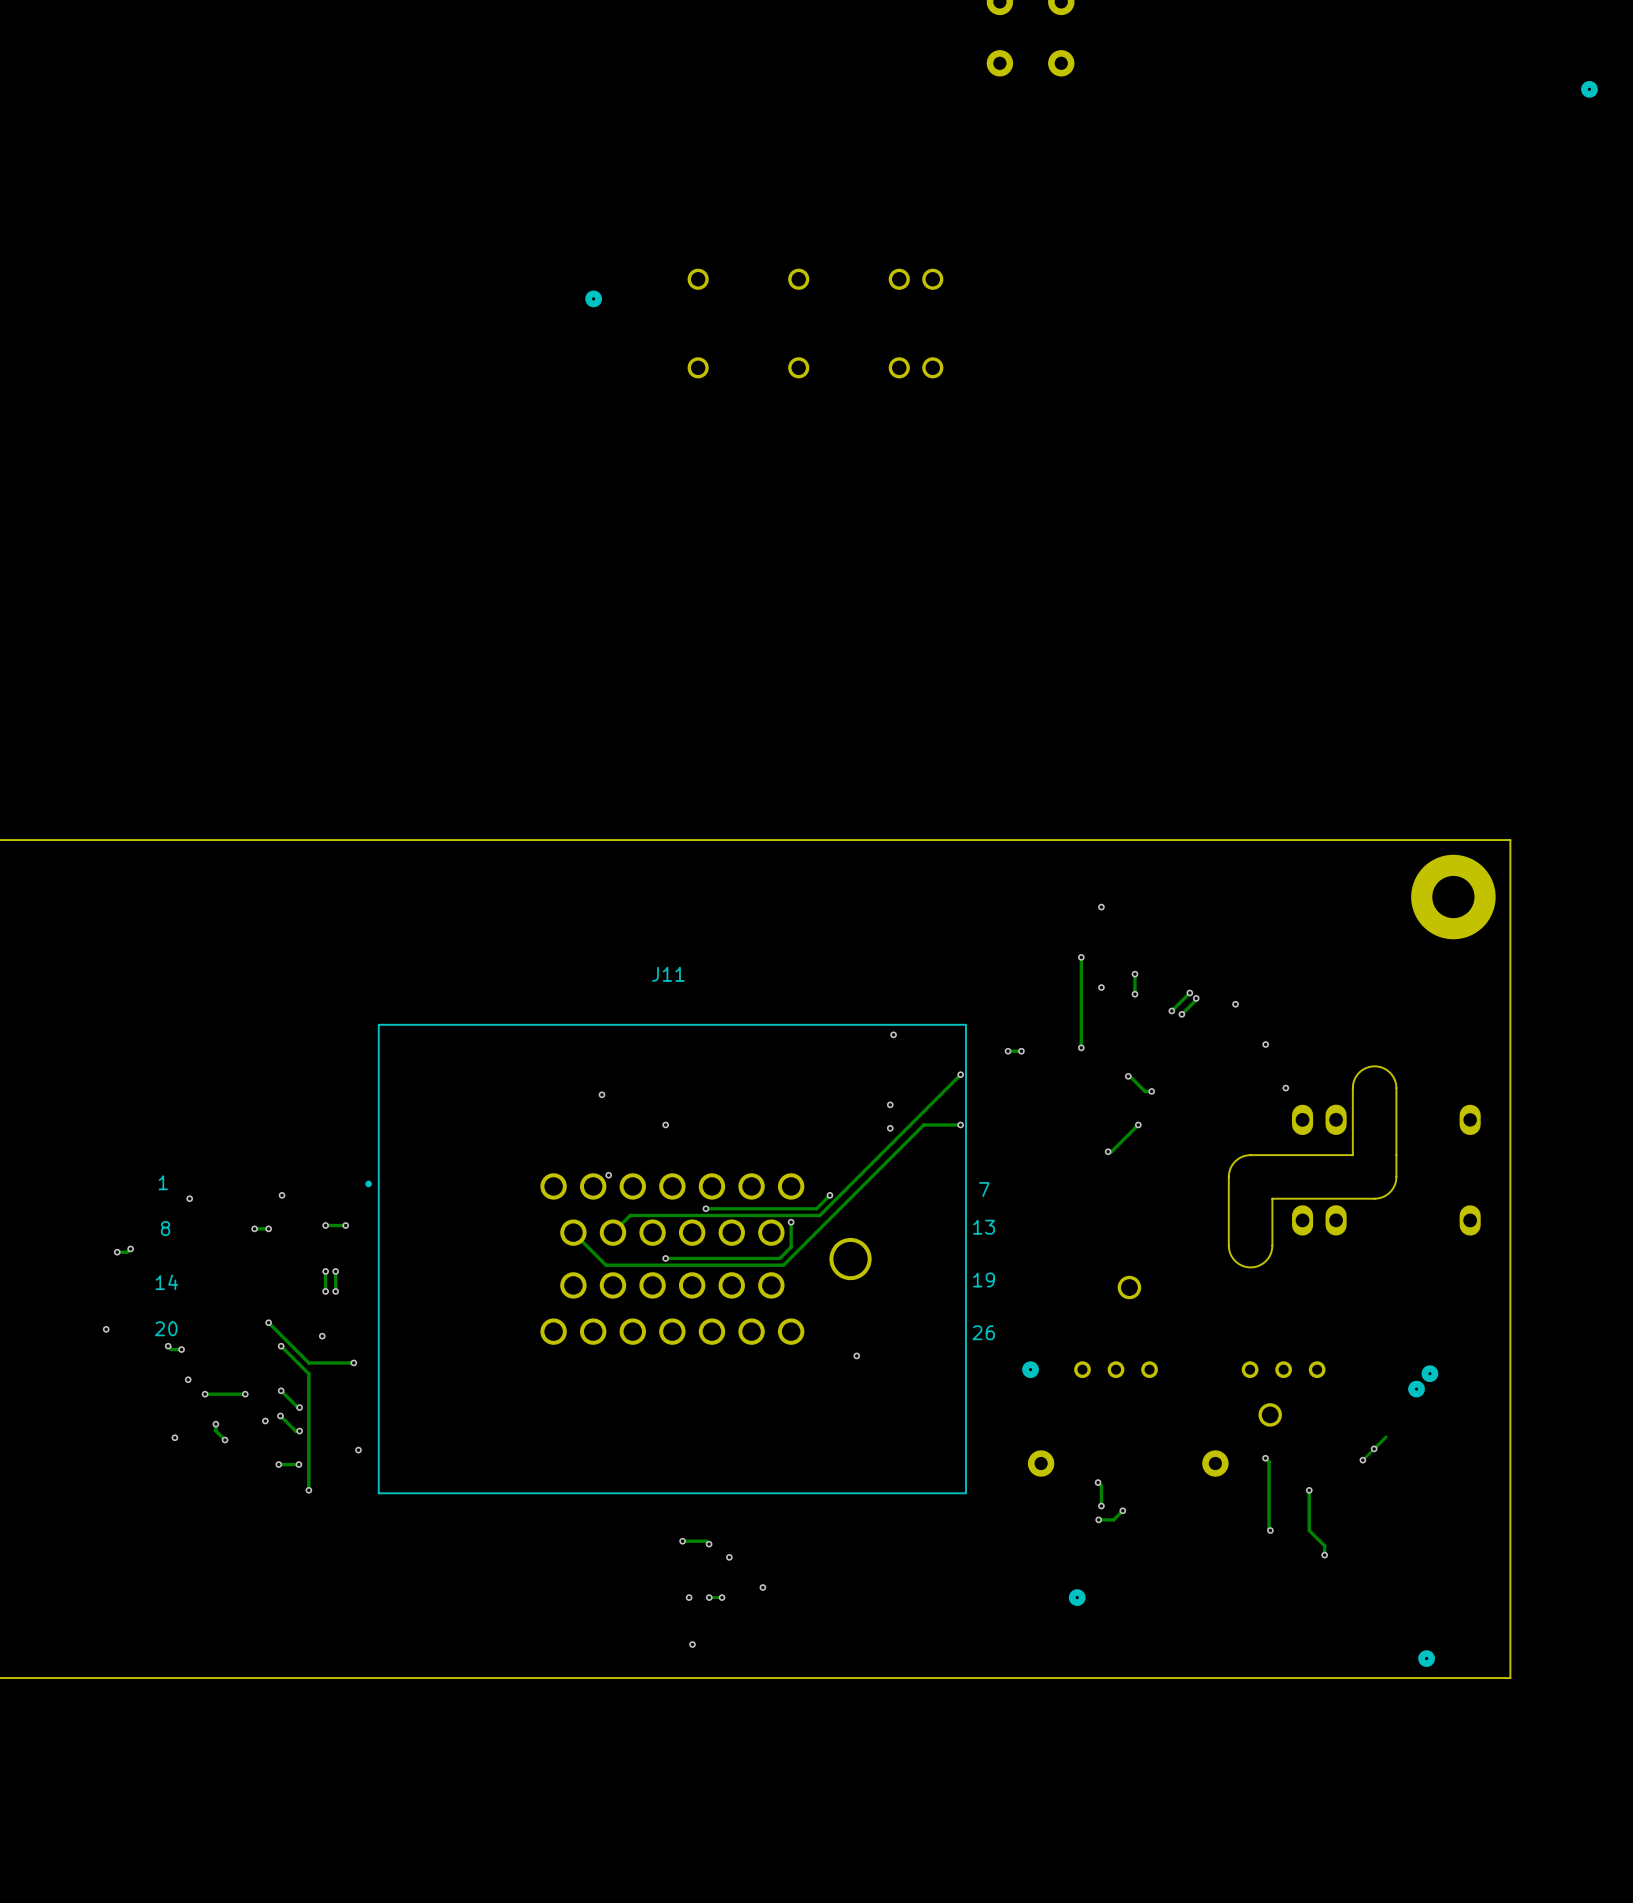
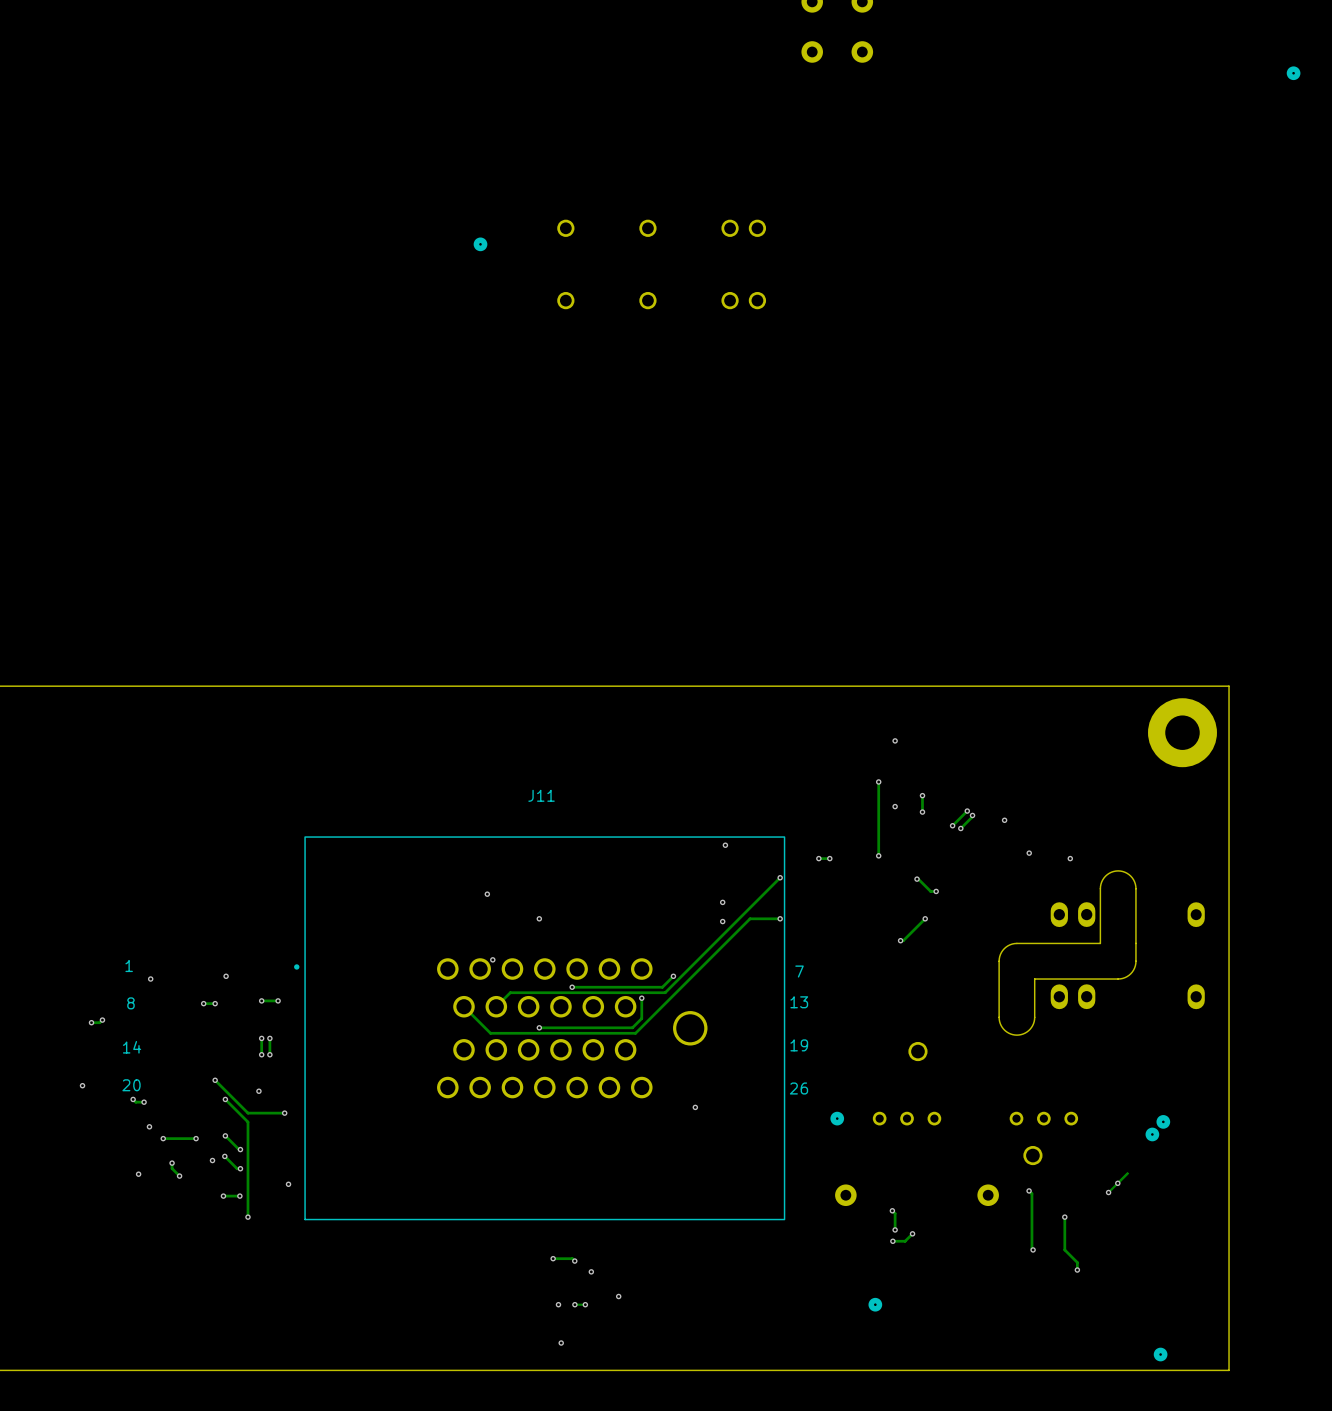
via position: (1285, 1088) -> (1070, 858)

